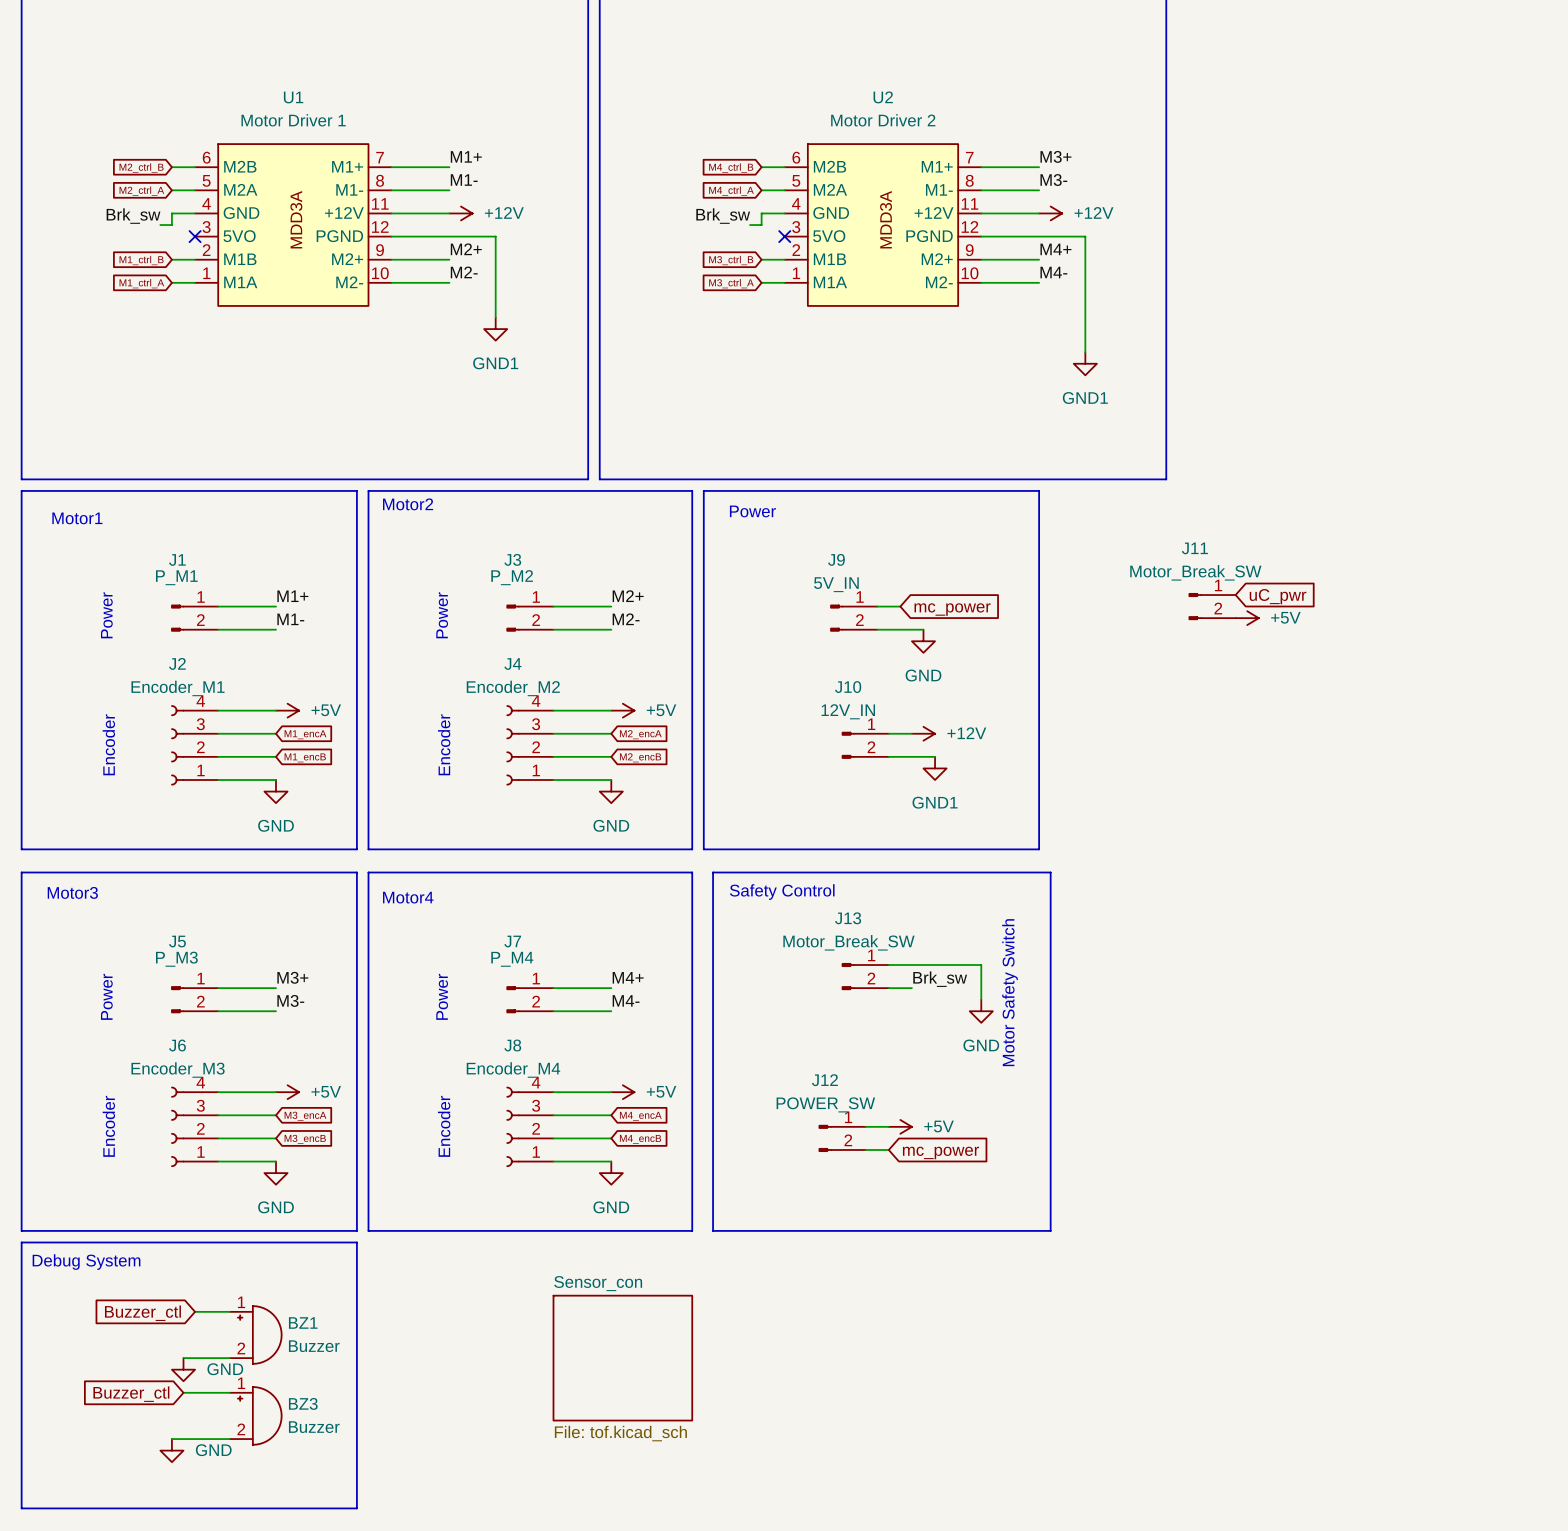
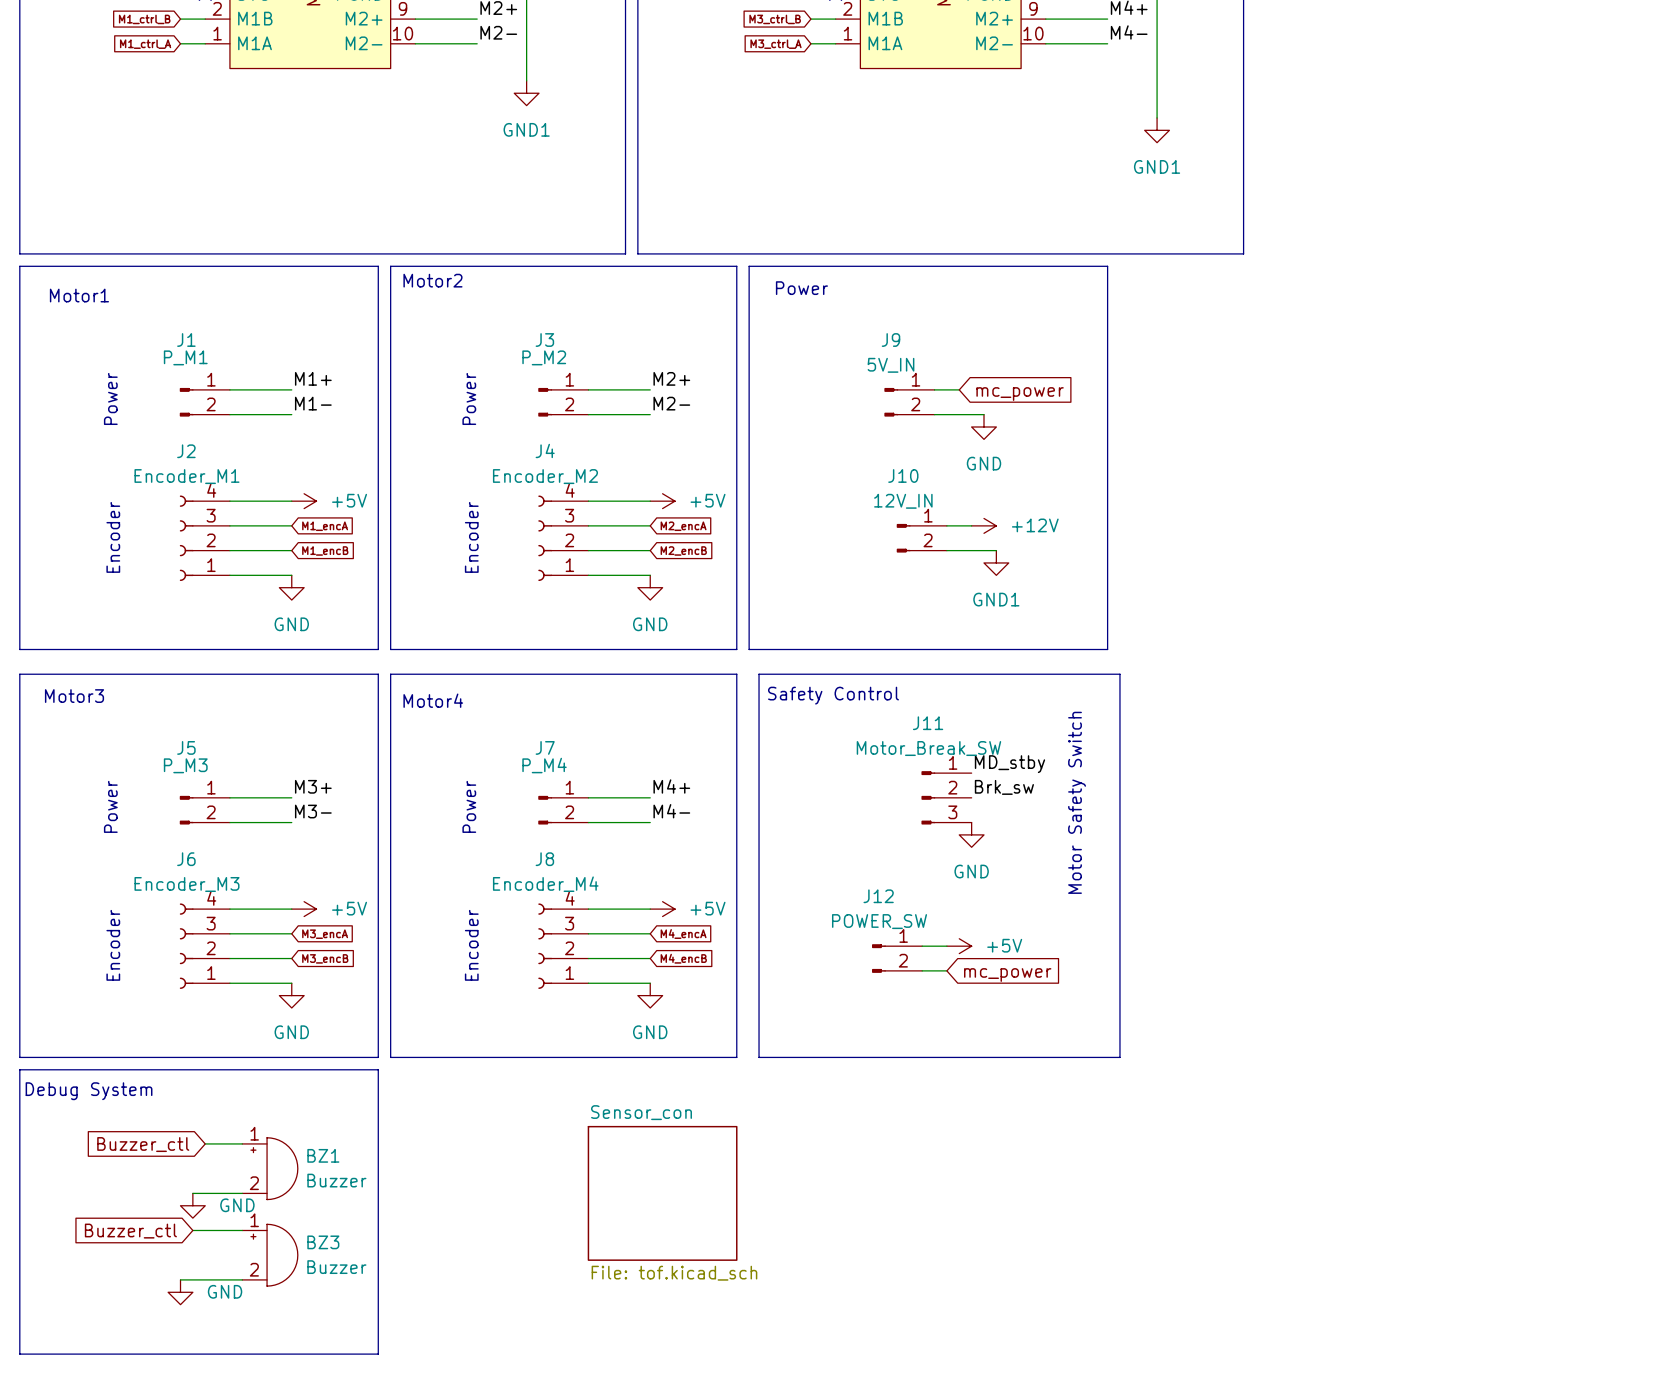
J11 symbol: [1188, 593, 1236, 620] -> [921, 771, 972, 825]
global label: uC_pwr (1278, 596) -> none
power symbol: +5V (1247, 618) -> none
label: none -> MD_stby (1009, 764)
wire: (888, 965) (981, 965) (981, 999) -> none
J13: Motor_Break_SW (865, 976) -> none
power symbol position: GND (981, 1011) -> GND (971, 834)

